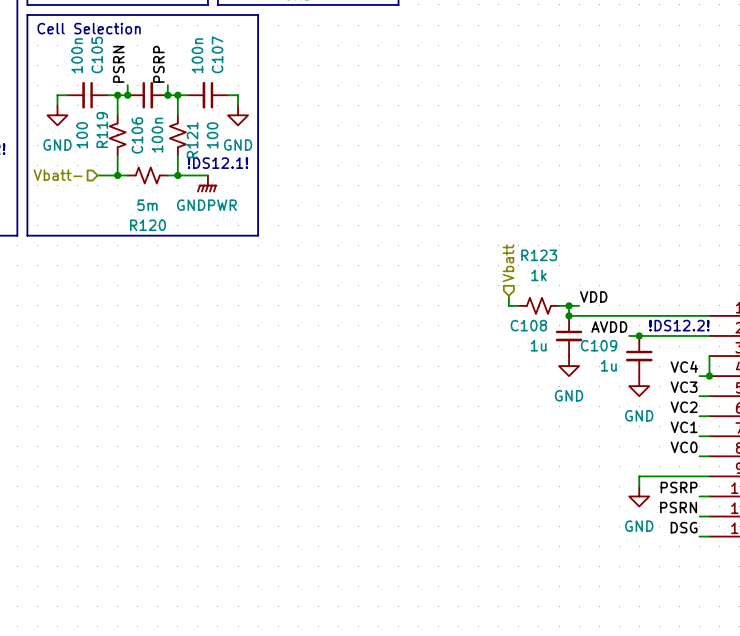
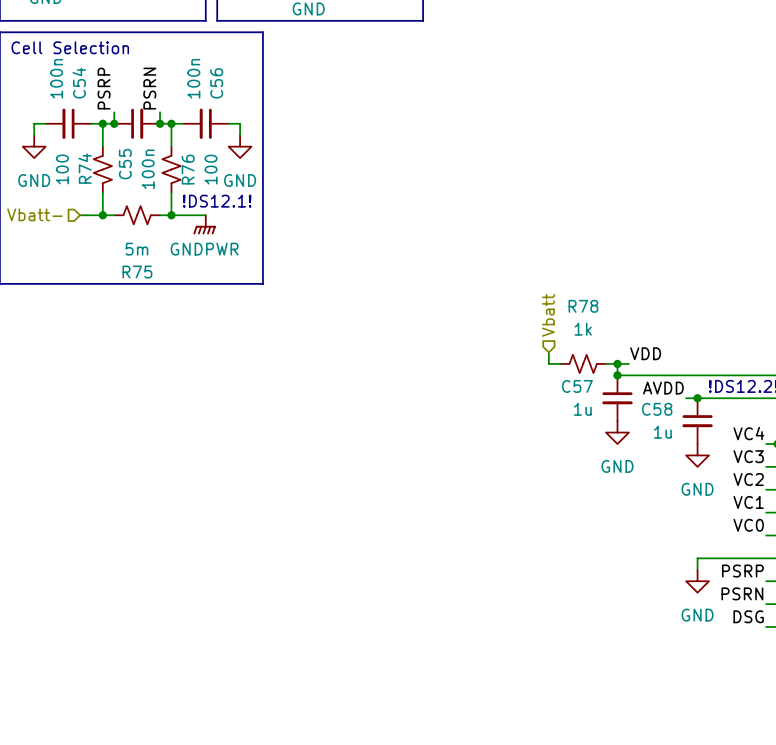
C107 name: C107 (217, 54) -> C56 (216, 83)
C105 name: C105 (97, 55) -> C54 (79, 83)
label: PSRN (118, 64) -> PSRP (104, 88)
label: PSRP (158, 64) -> PSRN (149, 88)
R119 name: R119 (102, 130) -> R74 (84, 168)
C106 name: C106 (137, 135) -> C55 (125, 164)
R121 name: R121 (192, 140) -> R76 (188, 169)
R120 name: R120 (148, 225) -> R75 (137, 272)
R123 name: R123 (539, 255) -> R78 (583, 306)
C108 name: C108 (528, 325) -> C57 (577, 386)
C109 name: C109 (599, 345) -> C58 (657, 409)

